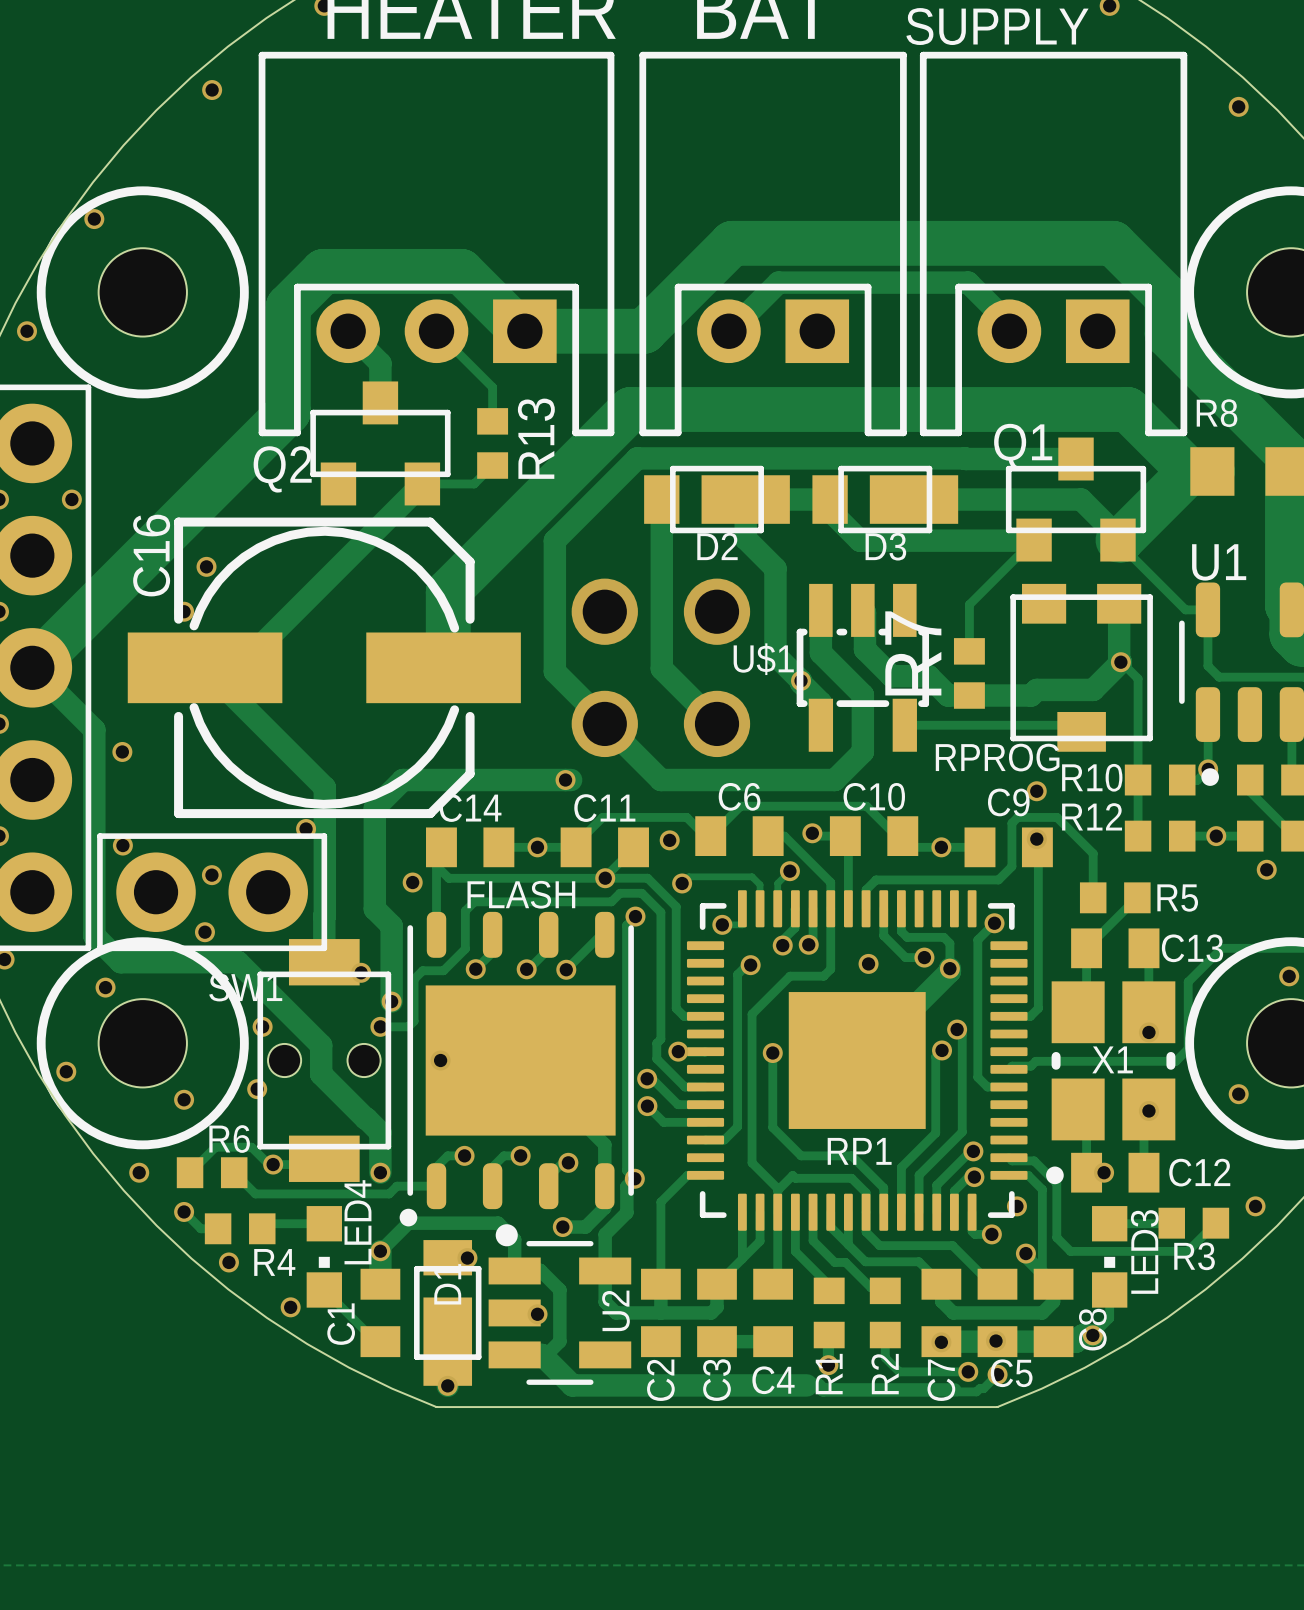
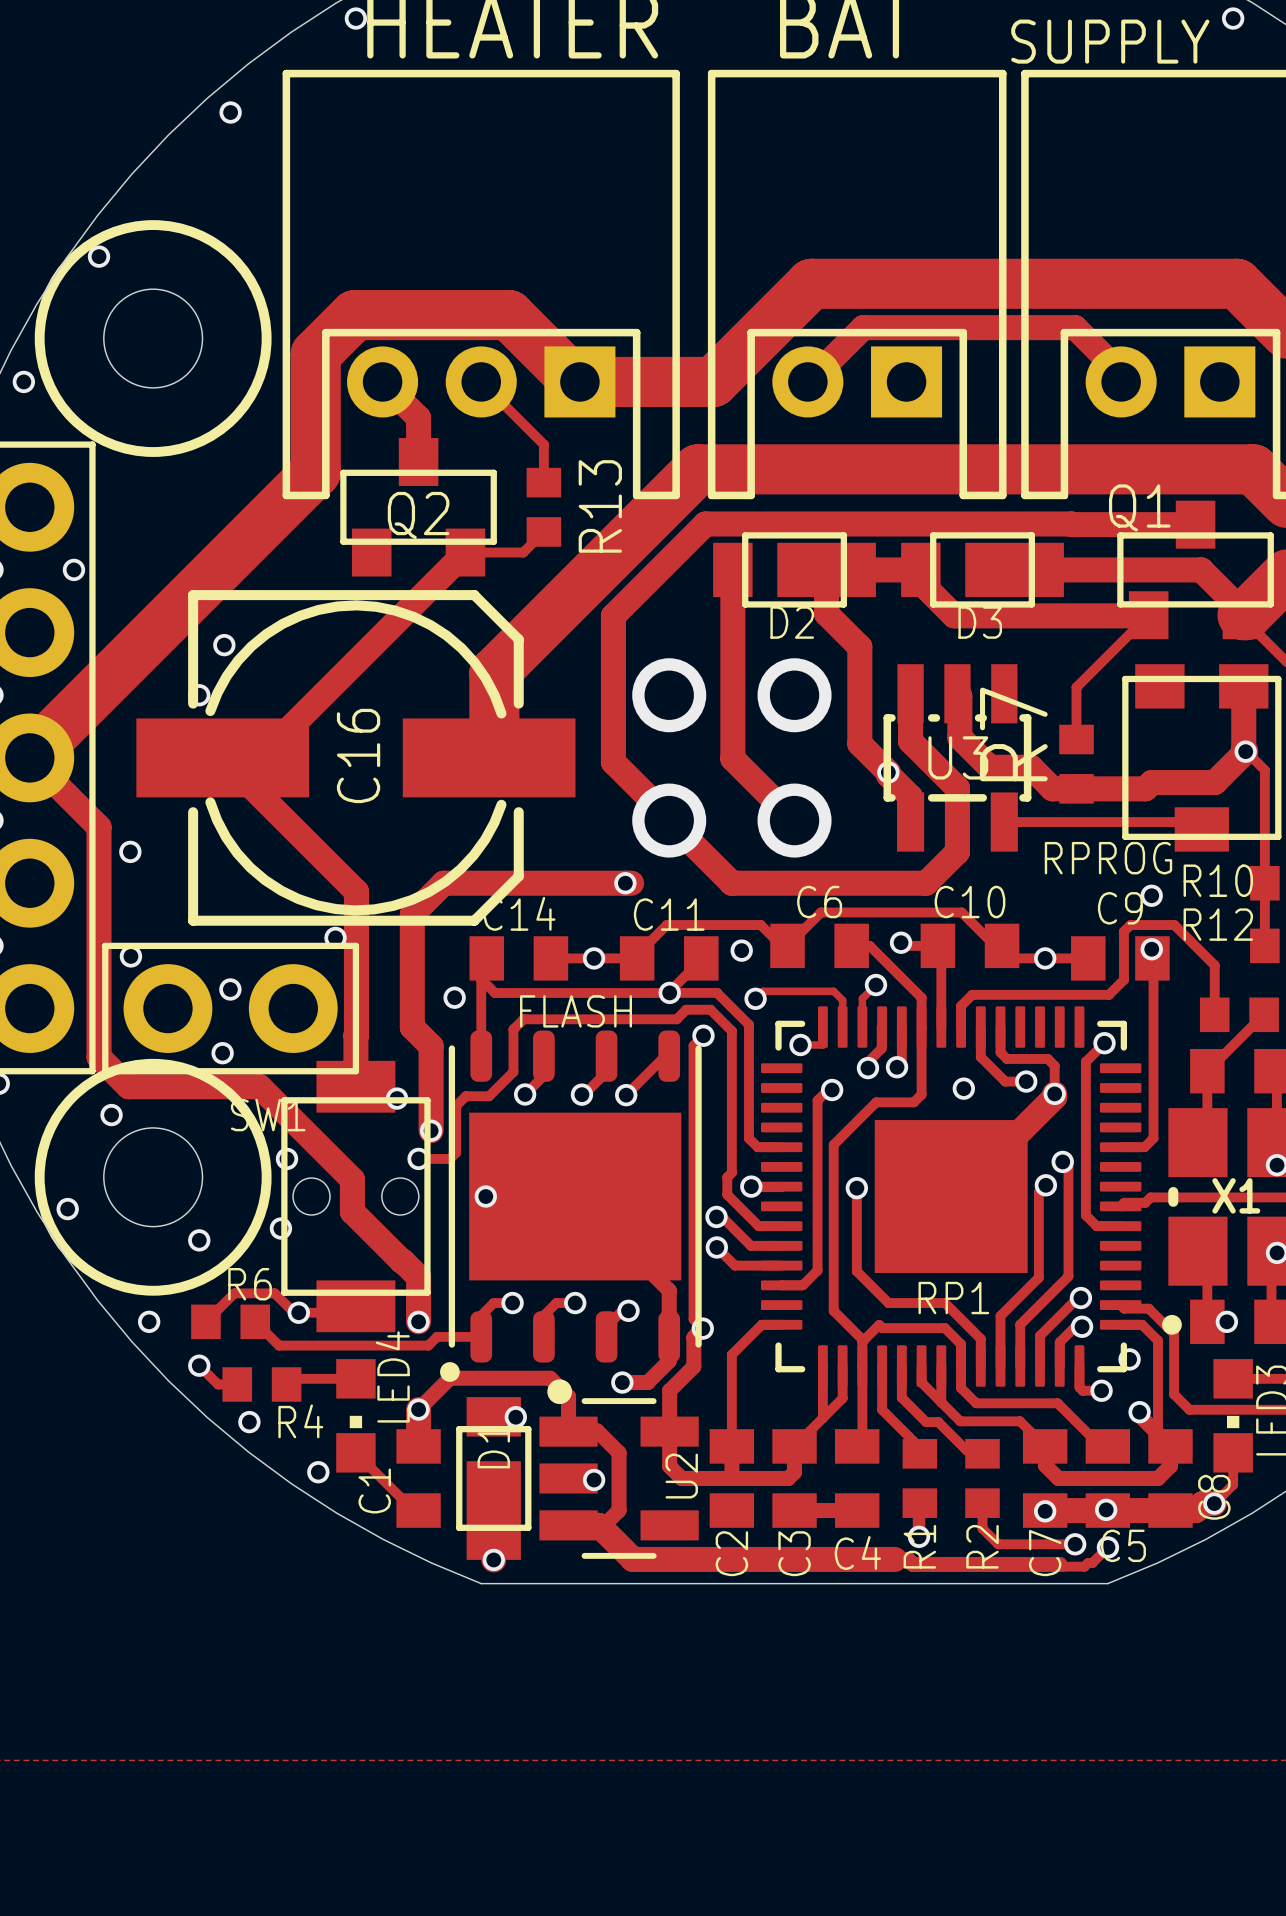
R13 name position: R13 (536, 438) -> R13 (600, 506)
Q2 name position: Q2 (282, 469) -> Q2 (418, 515)
C16 name position: C16 (151, 555) -> C16 (358, 755)
U$1 name: U$1 (763, 659) -> U3 (958, 757)

